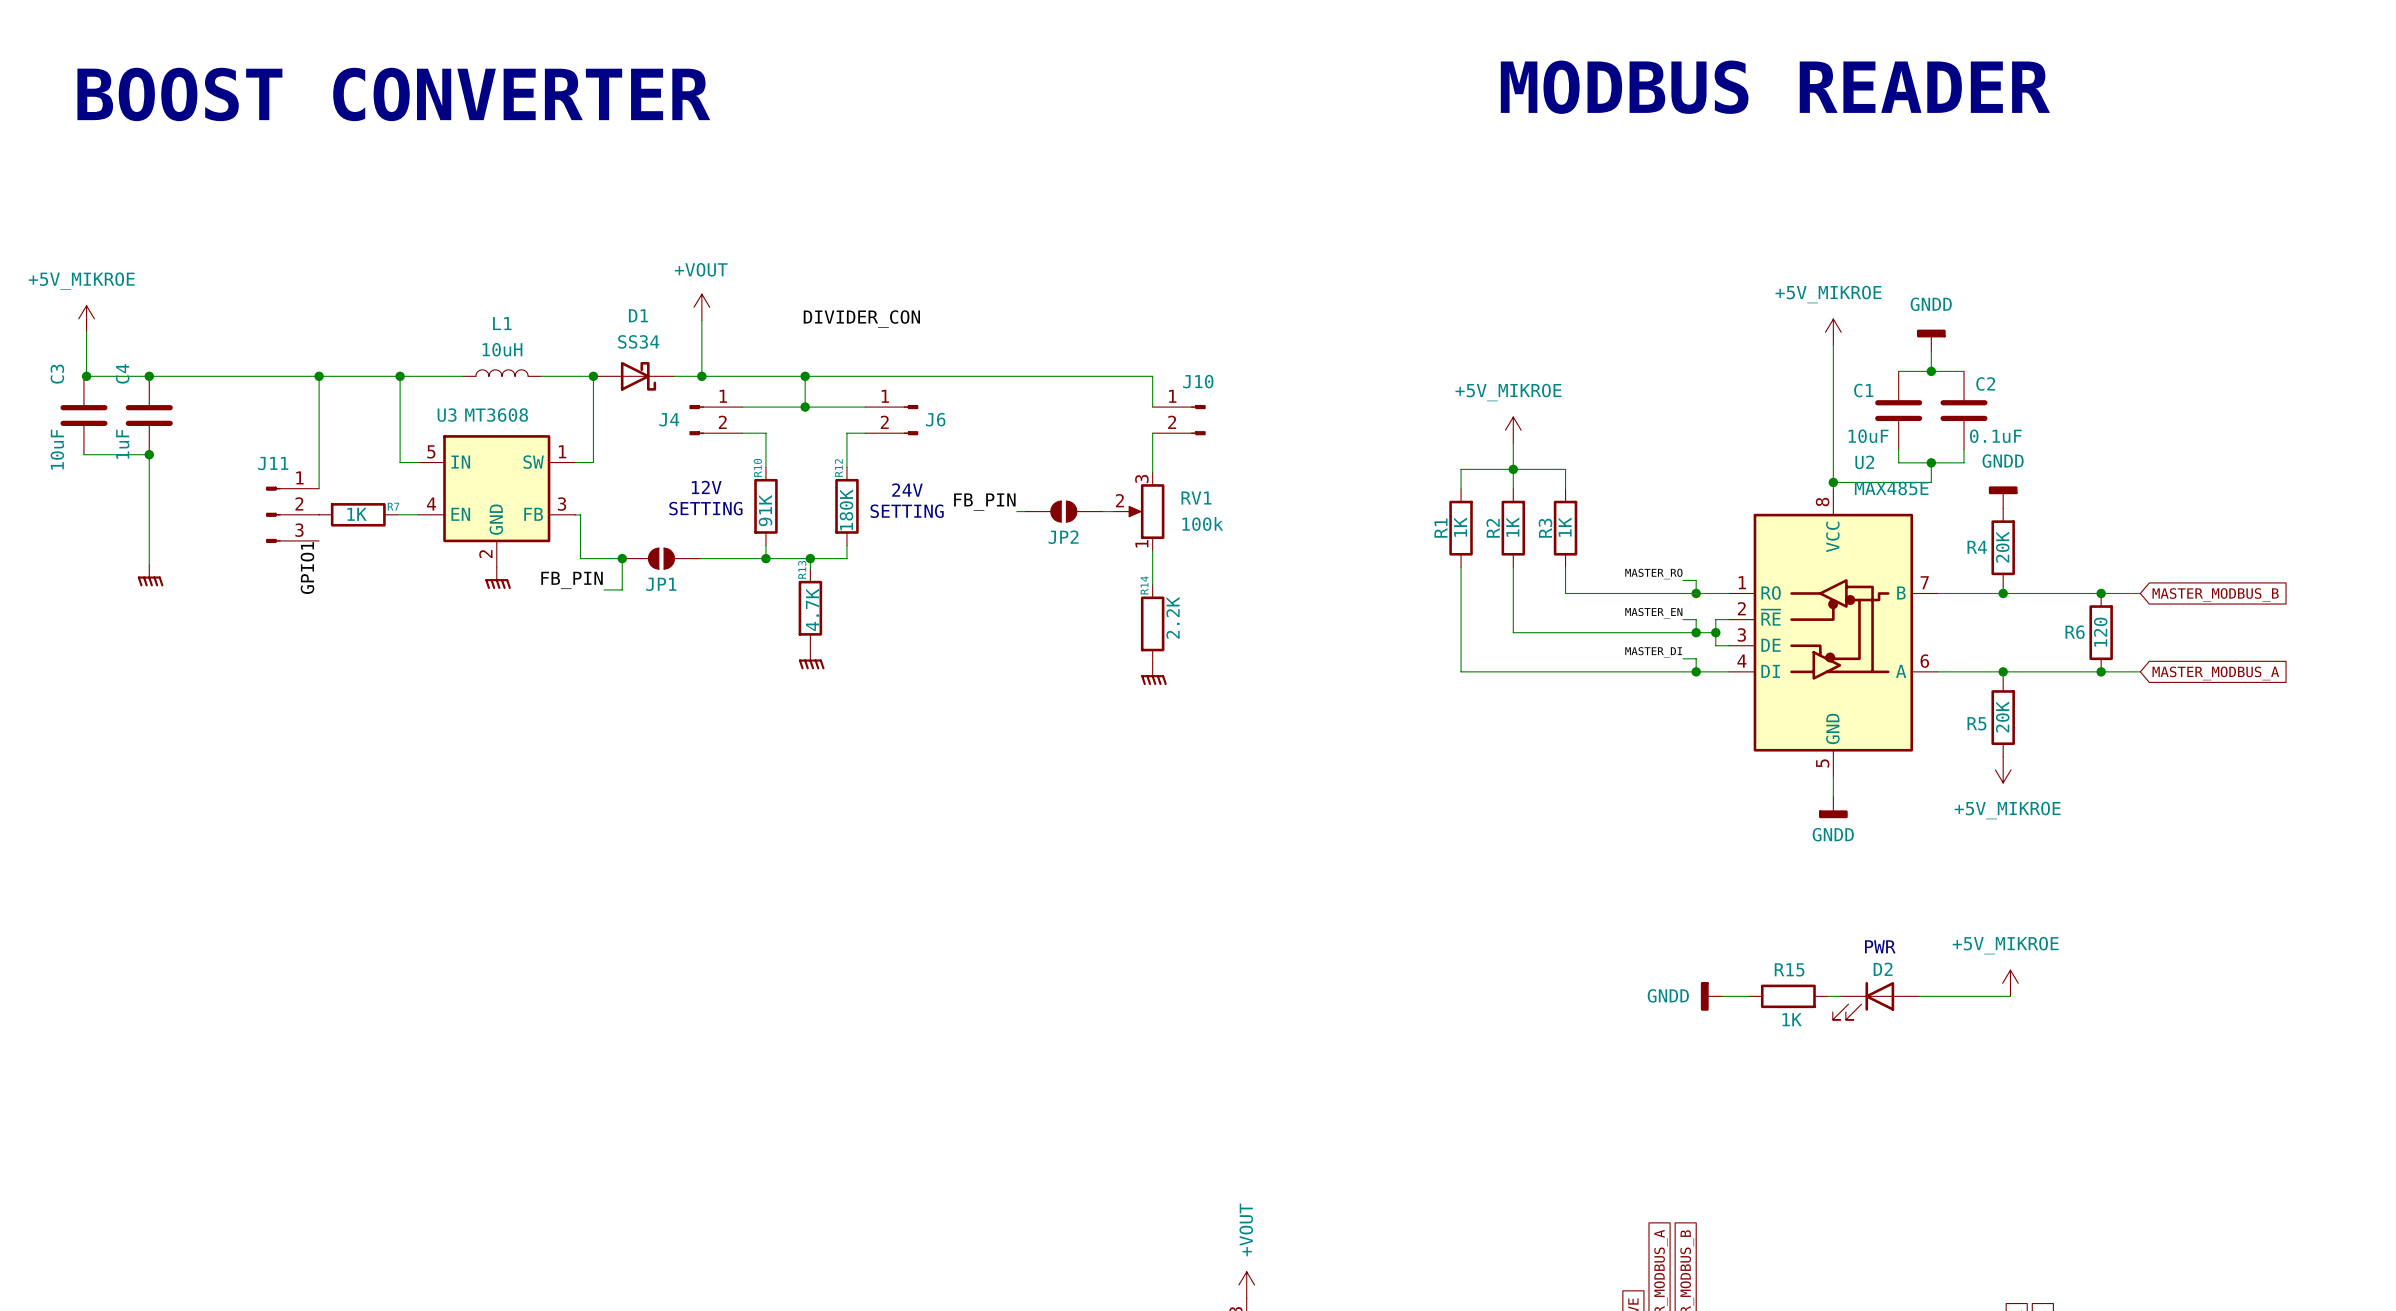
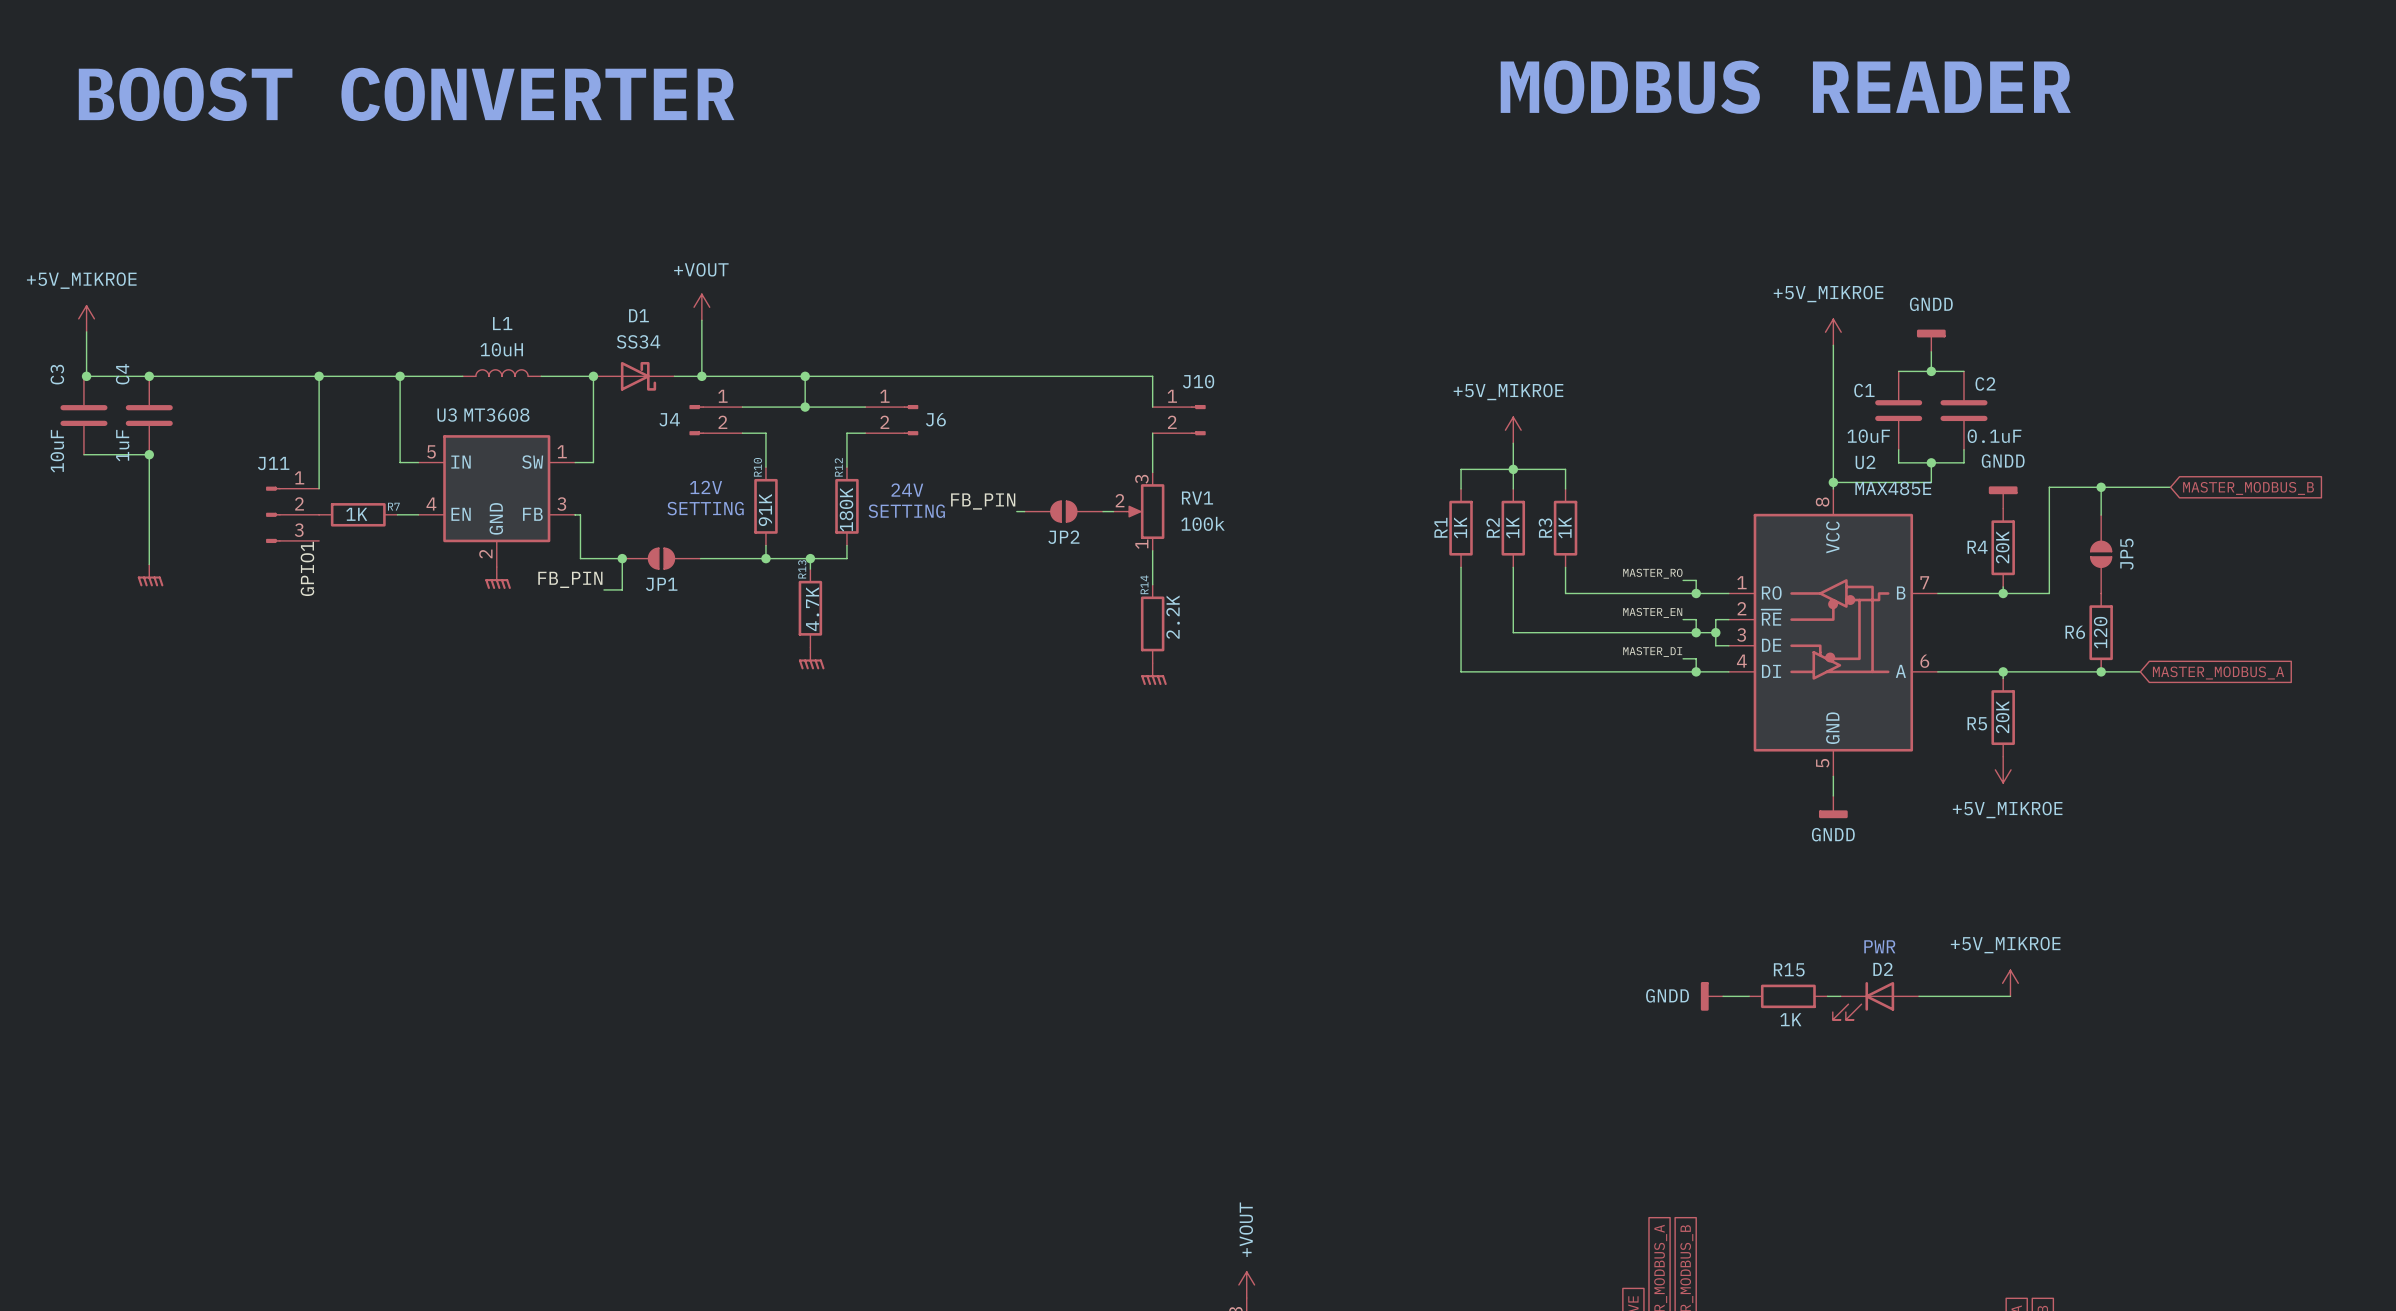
label: DIVIDER_CON (861, 319) -> none
wire: none -> (2101, 487) (2101, 515)
junction: none -> (2101, 487)
JP5: none -> (2101, 554)
wire: (2049, 593) (2140, 593) -> (2049, 593) (2049, 487) (2170, 487)
junction: (2101, 593) -> none
global label position: MASTER_MODBUS_B (2215, 595) -> MASTER_MODBUS_B (2248, 488)

